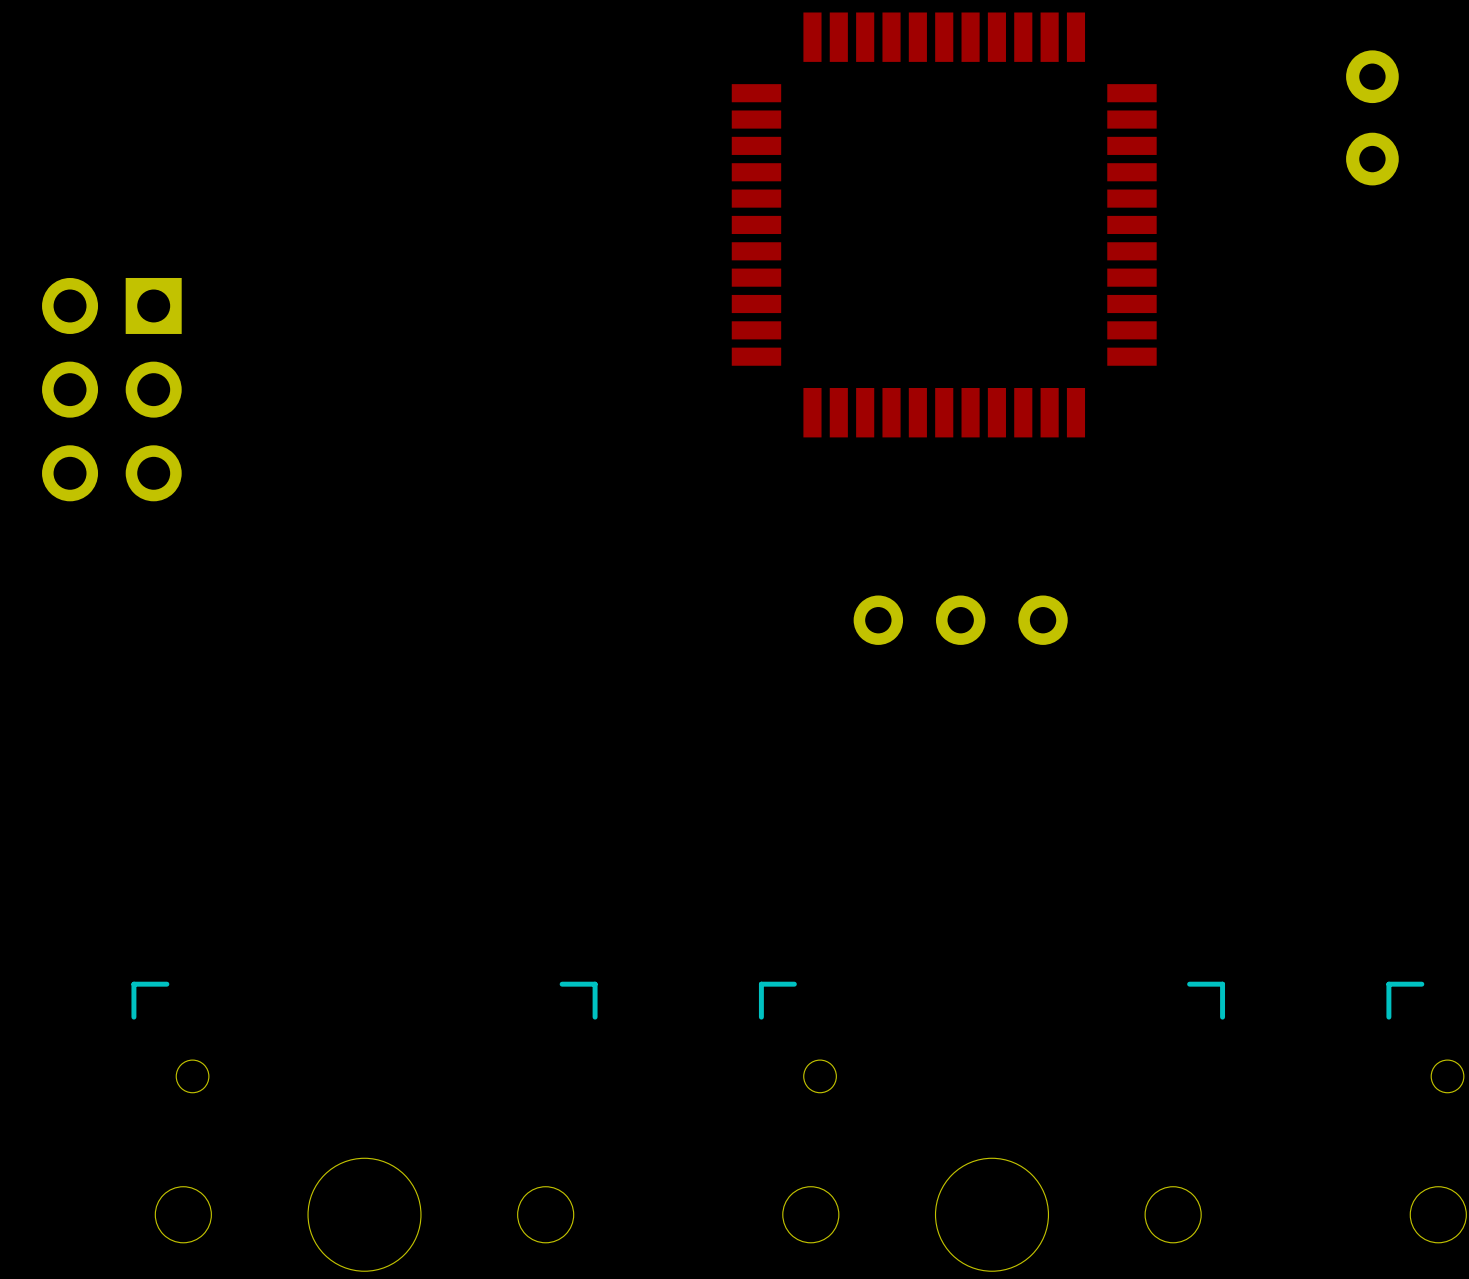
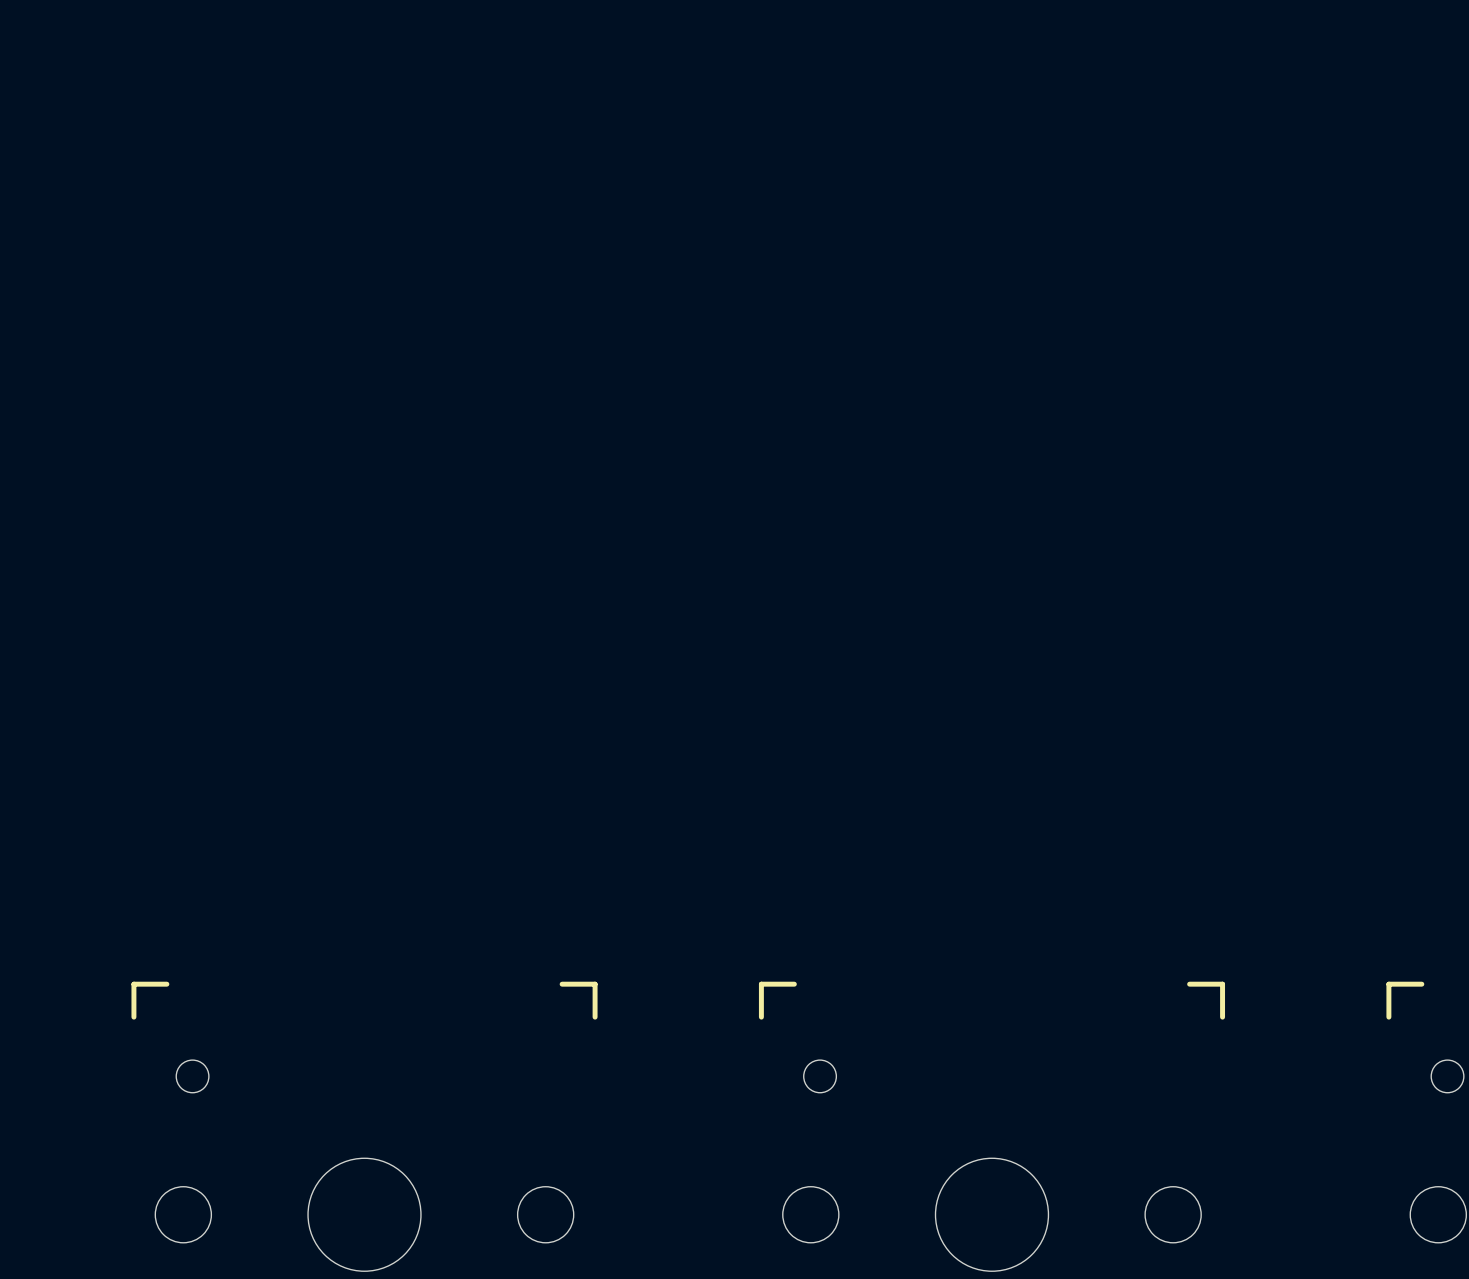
part: (1372, 117) -> none
part: (944, 224) -> none
part: (111, 389) -> none
part: (960, 620) -> none

